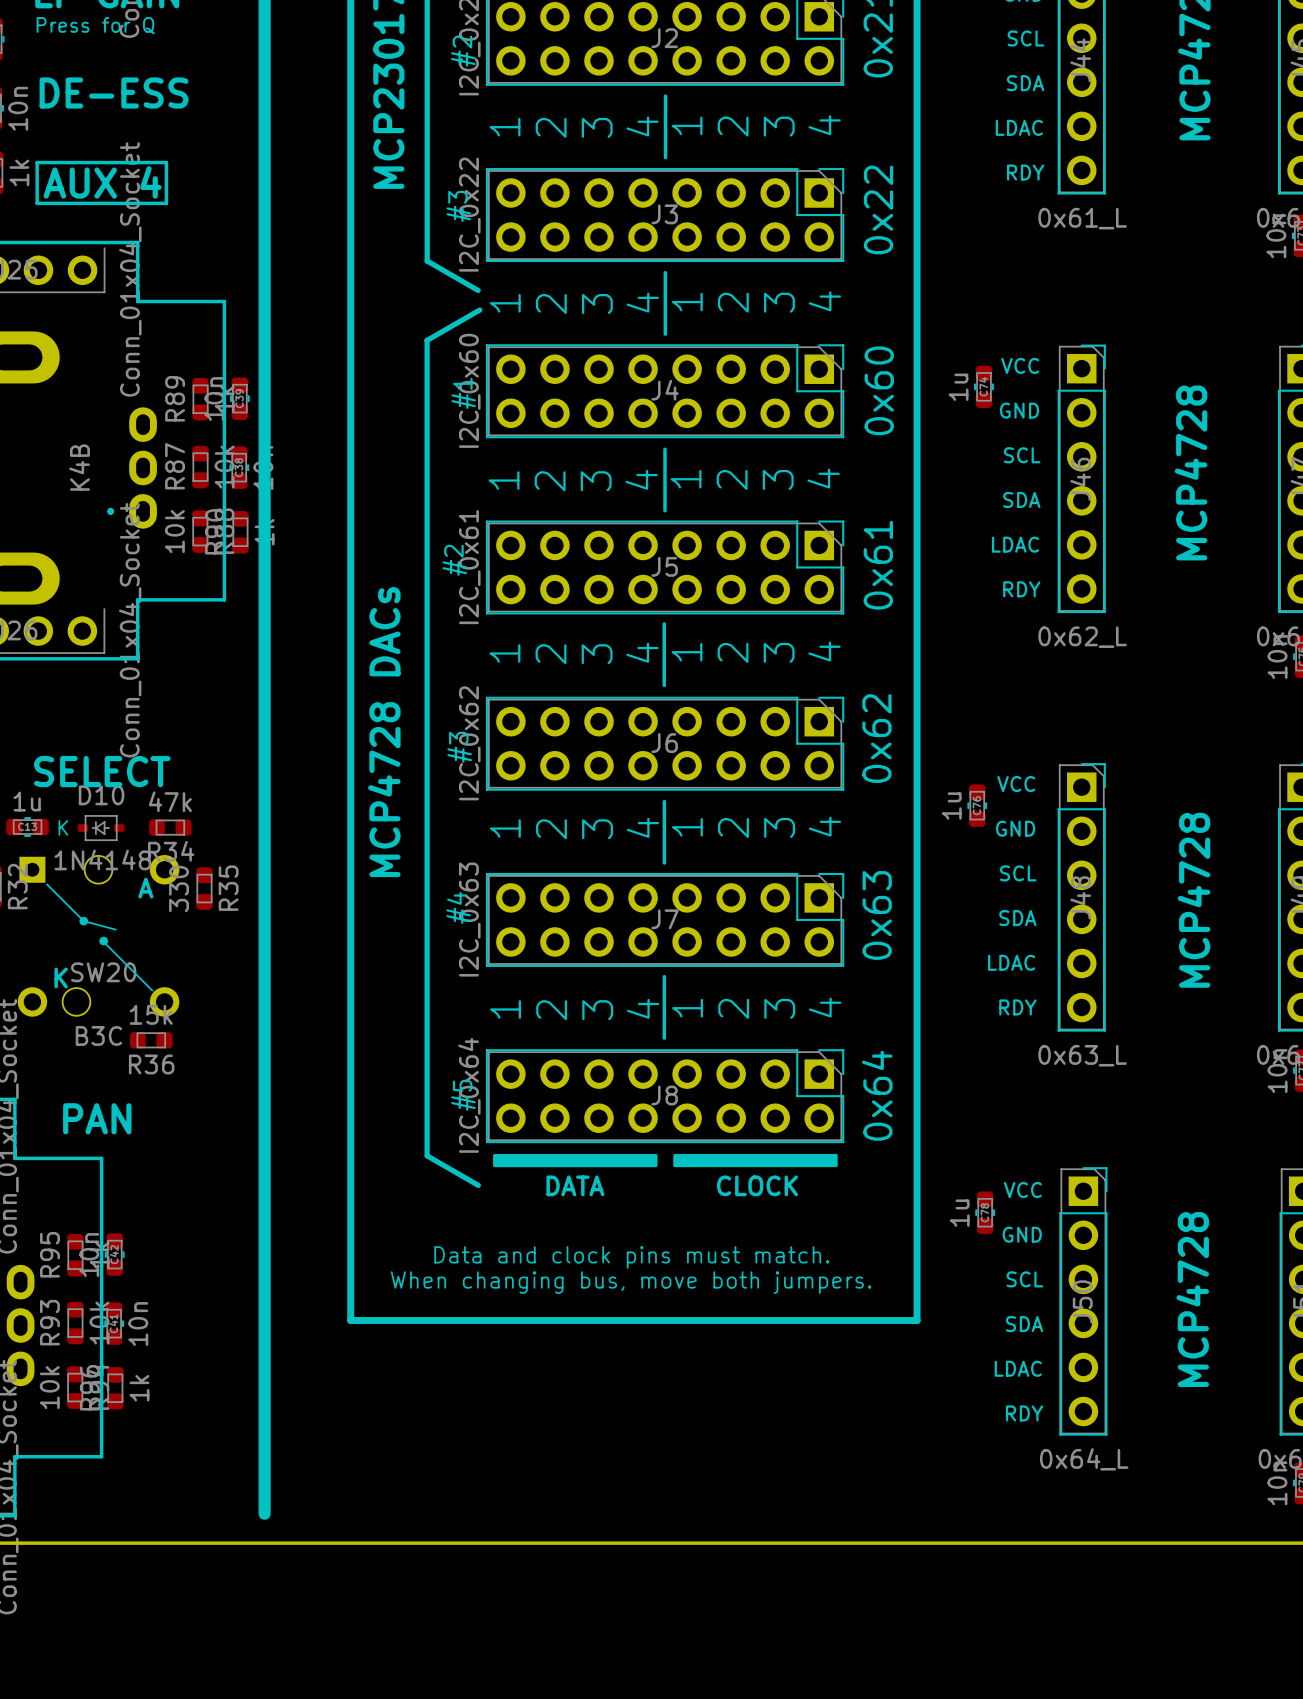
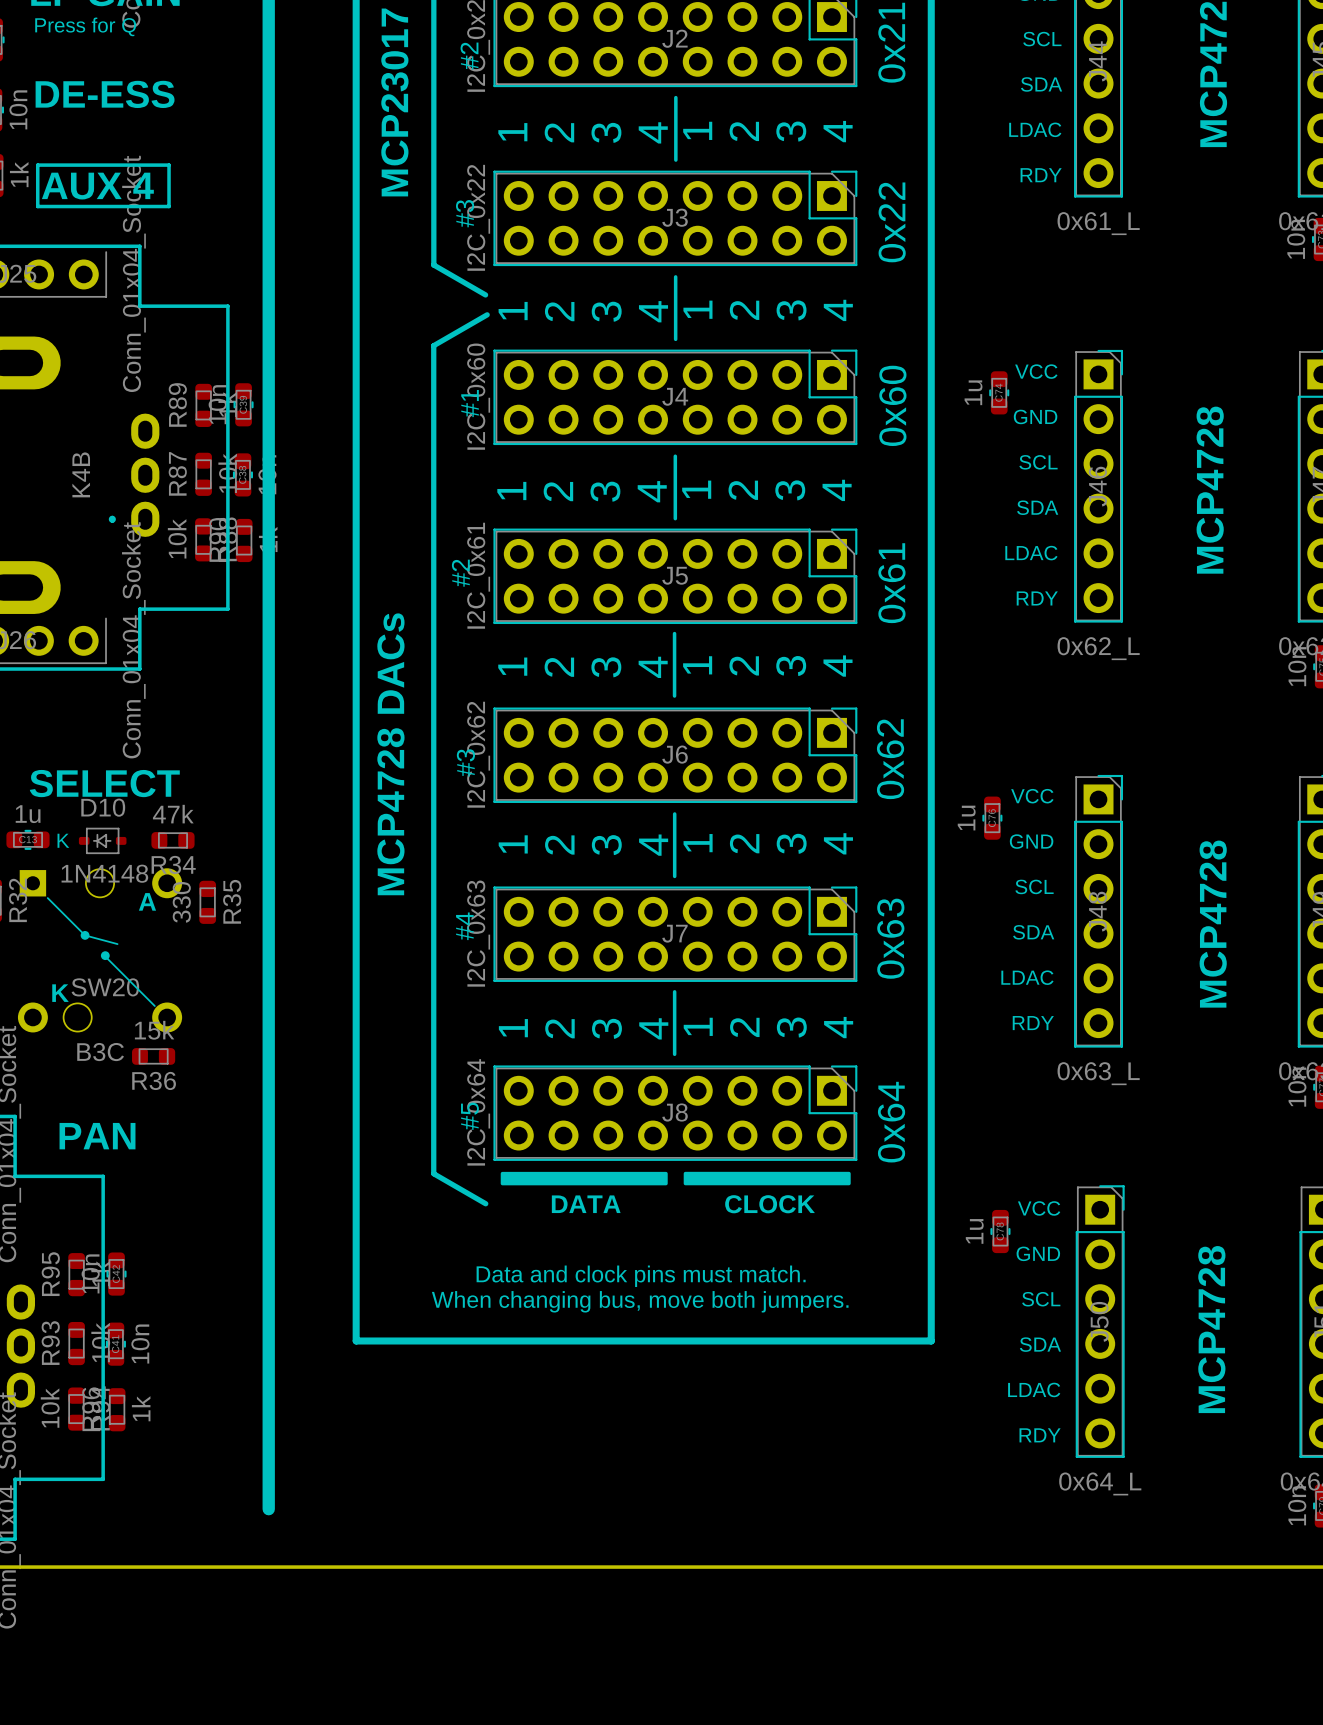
line: (264, 1486) (264, 1513) -> none

